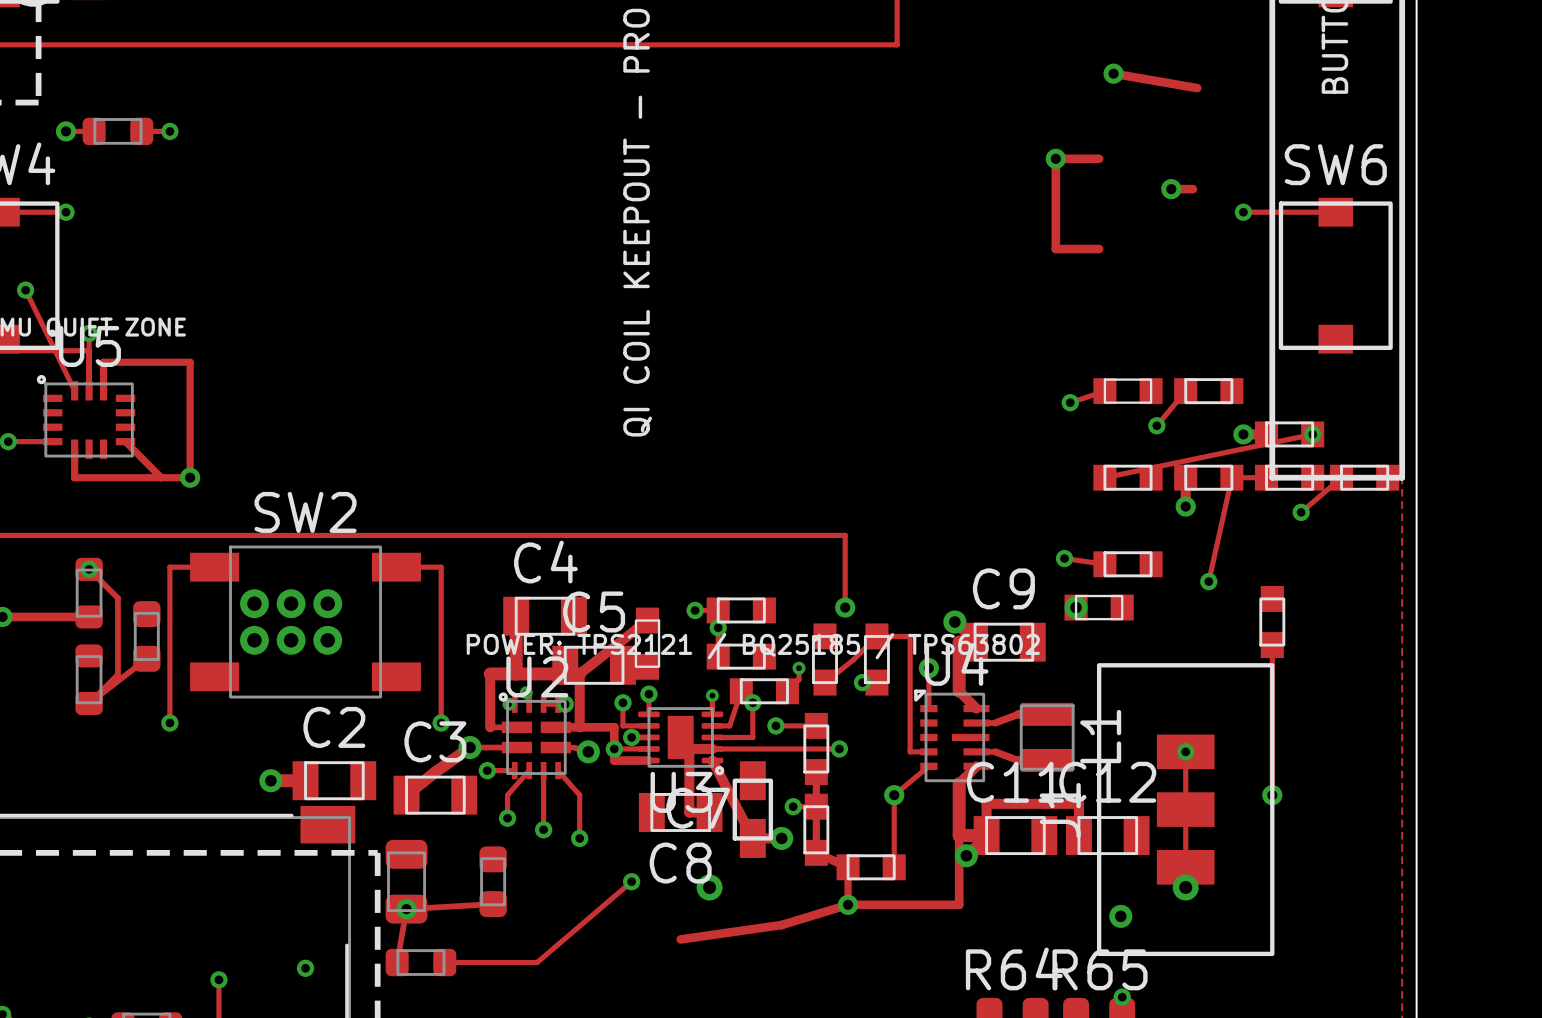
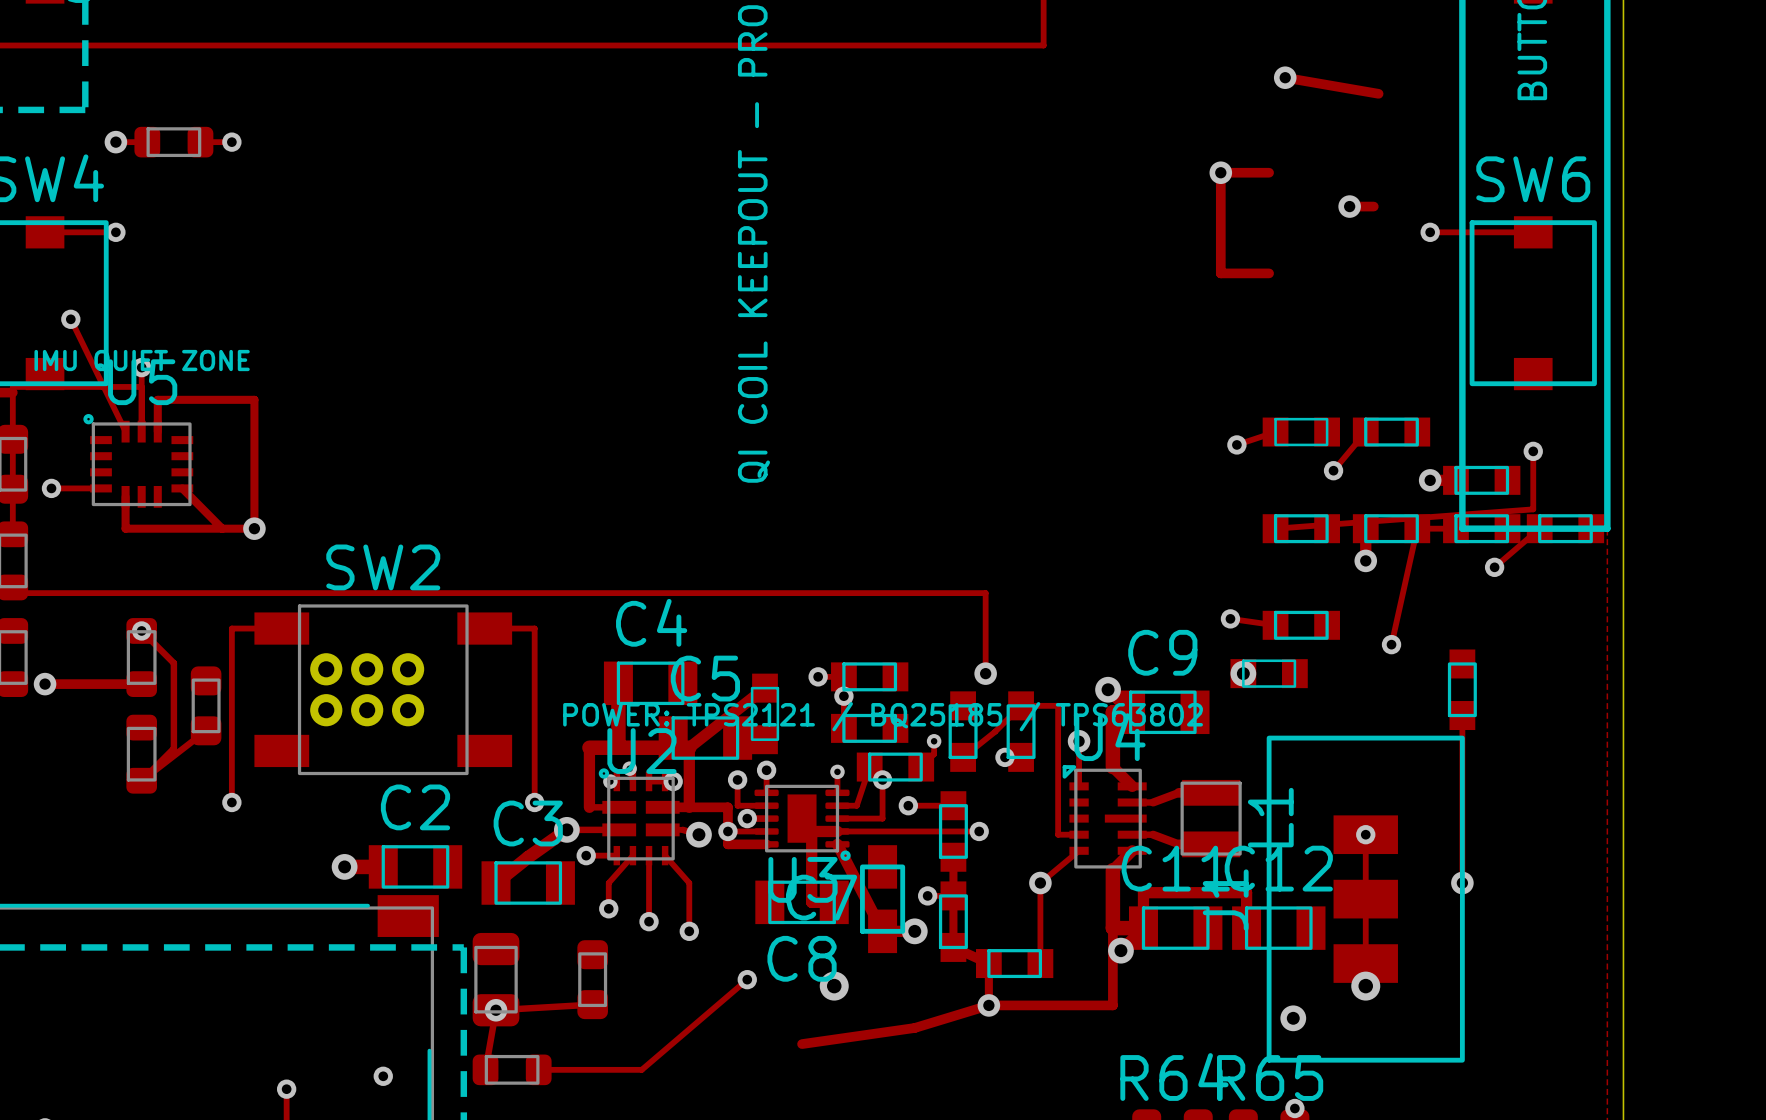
track: (1312, 434) (1104, 477) -> (1533, 451) (1533, 509) (1275, 528)
via position: (1312, 434) -> (1533, 451)

